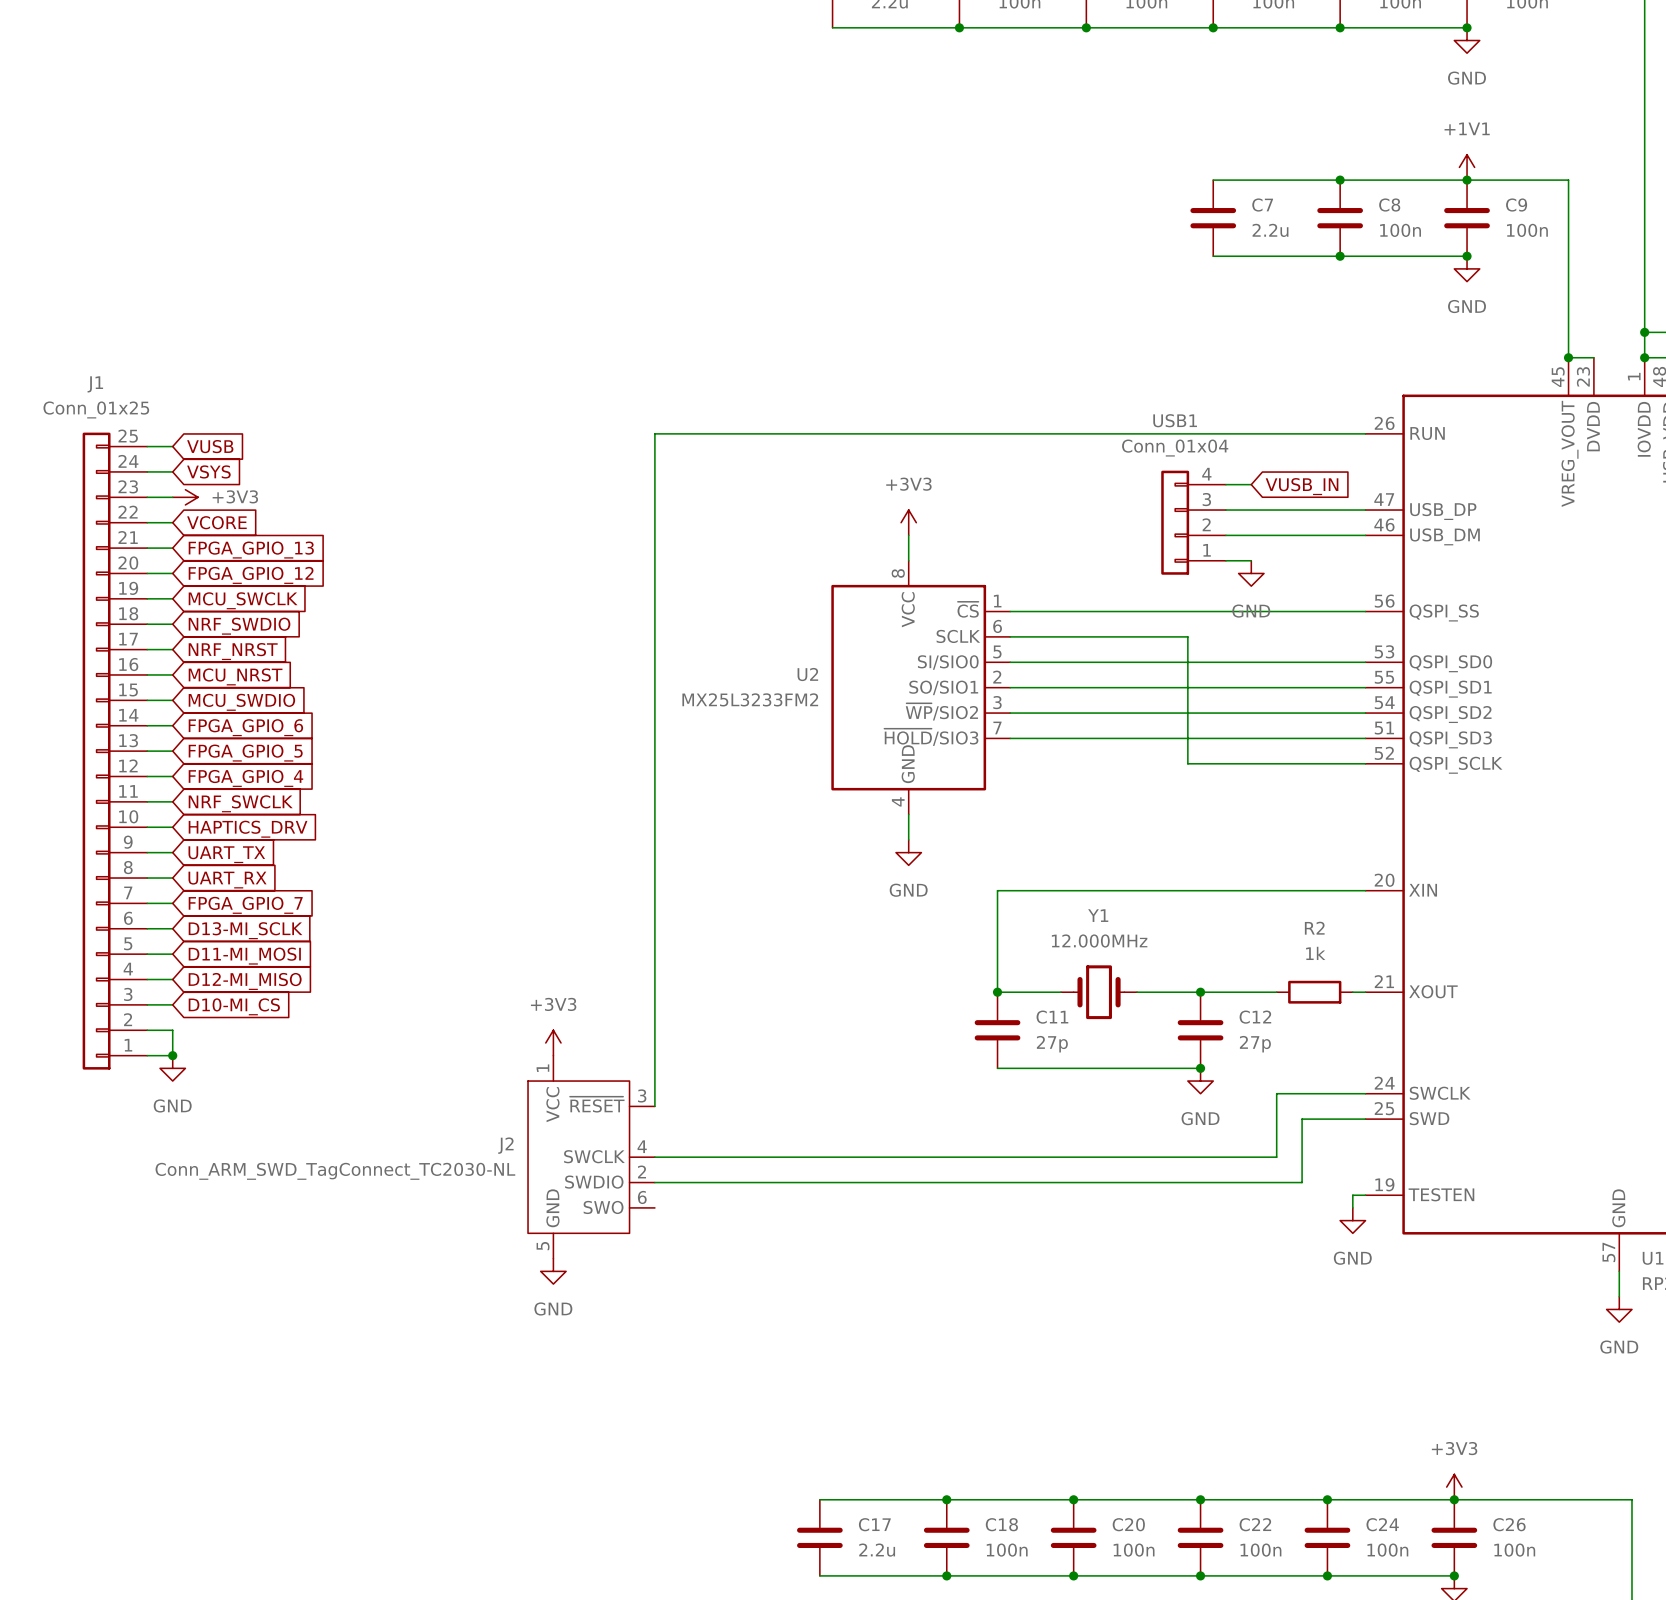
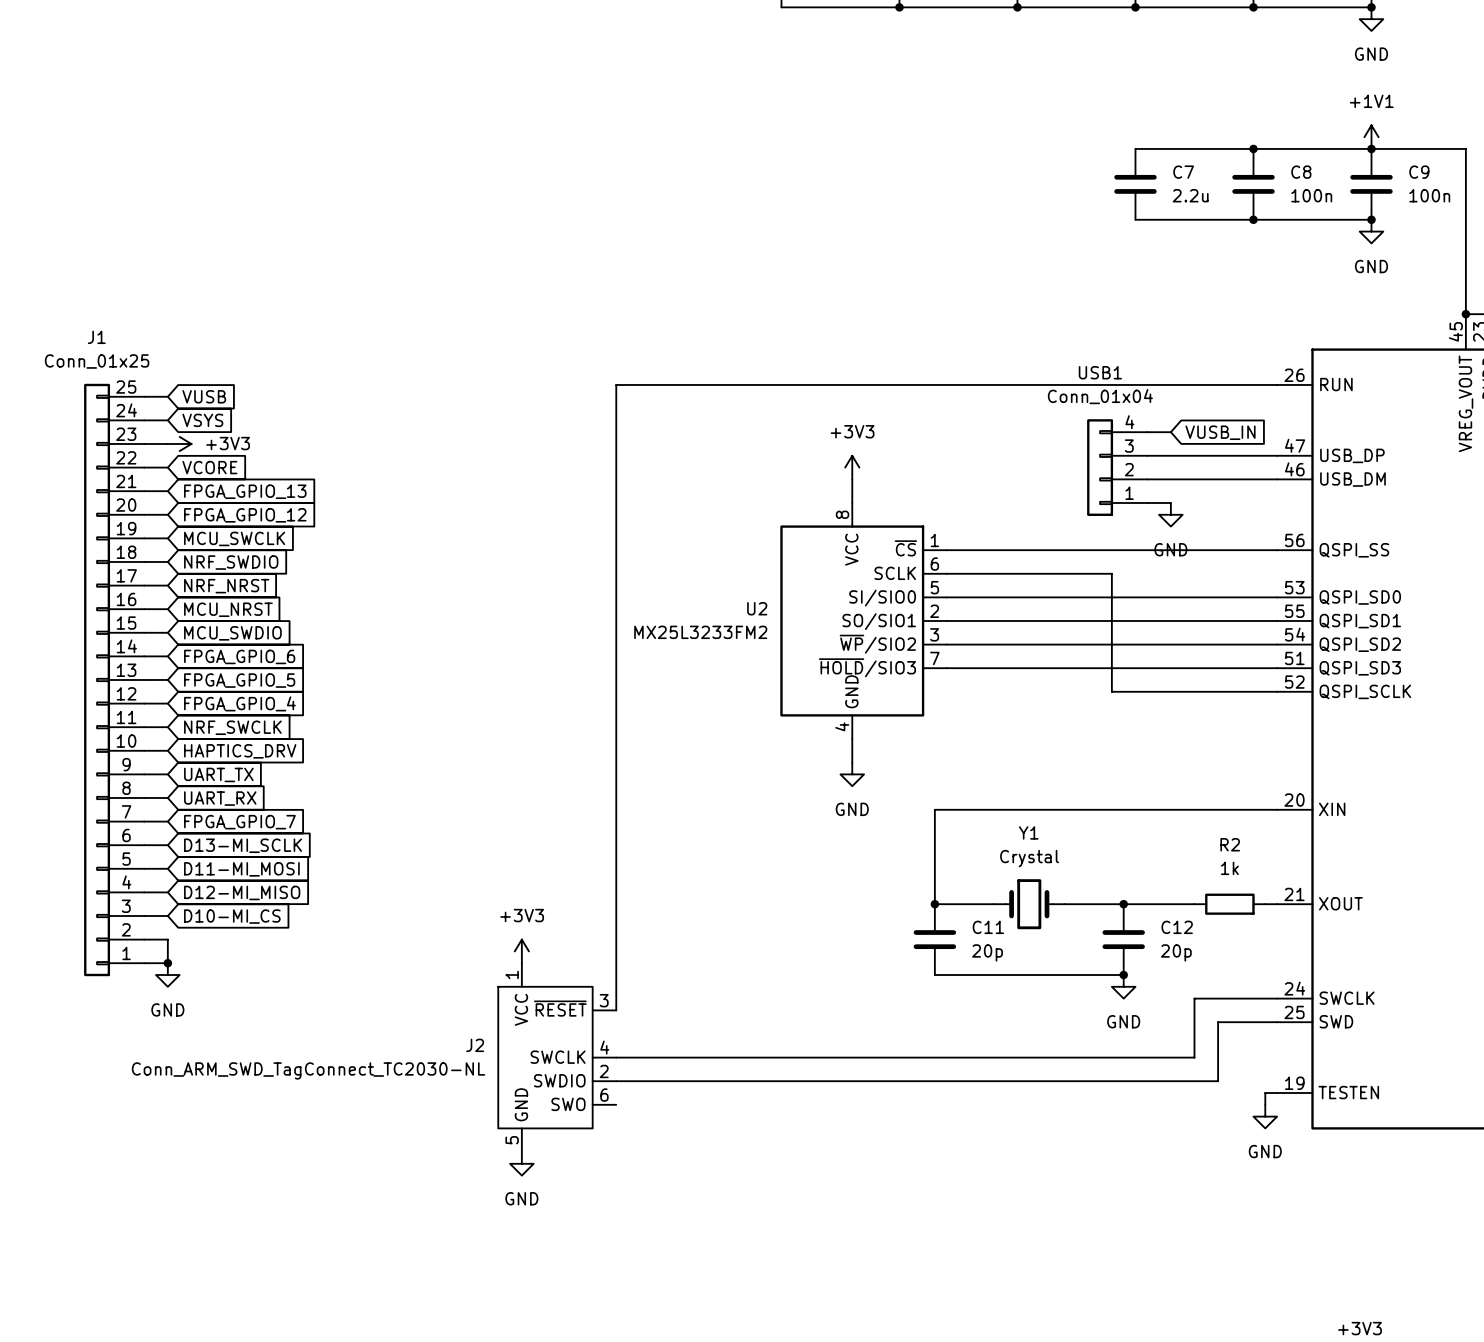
Y1 value: 12.000MHz (1099, 940) -> Crystal (1029, 858)
C11 value: 27p (1052, 1044) -> 20p (987, 952)
C12 value: 27p (1255, 1044) -> 20p (1176, 952)

